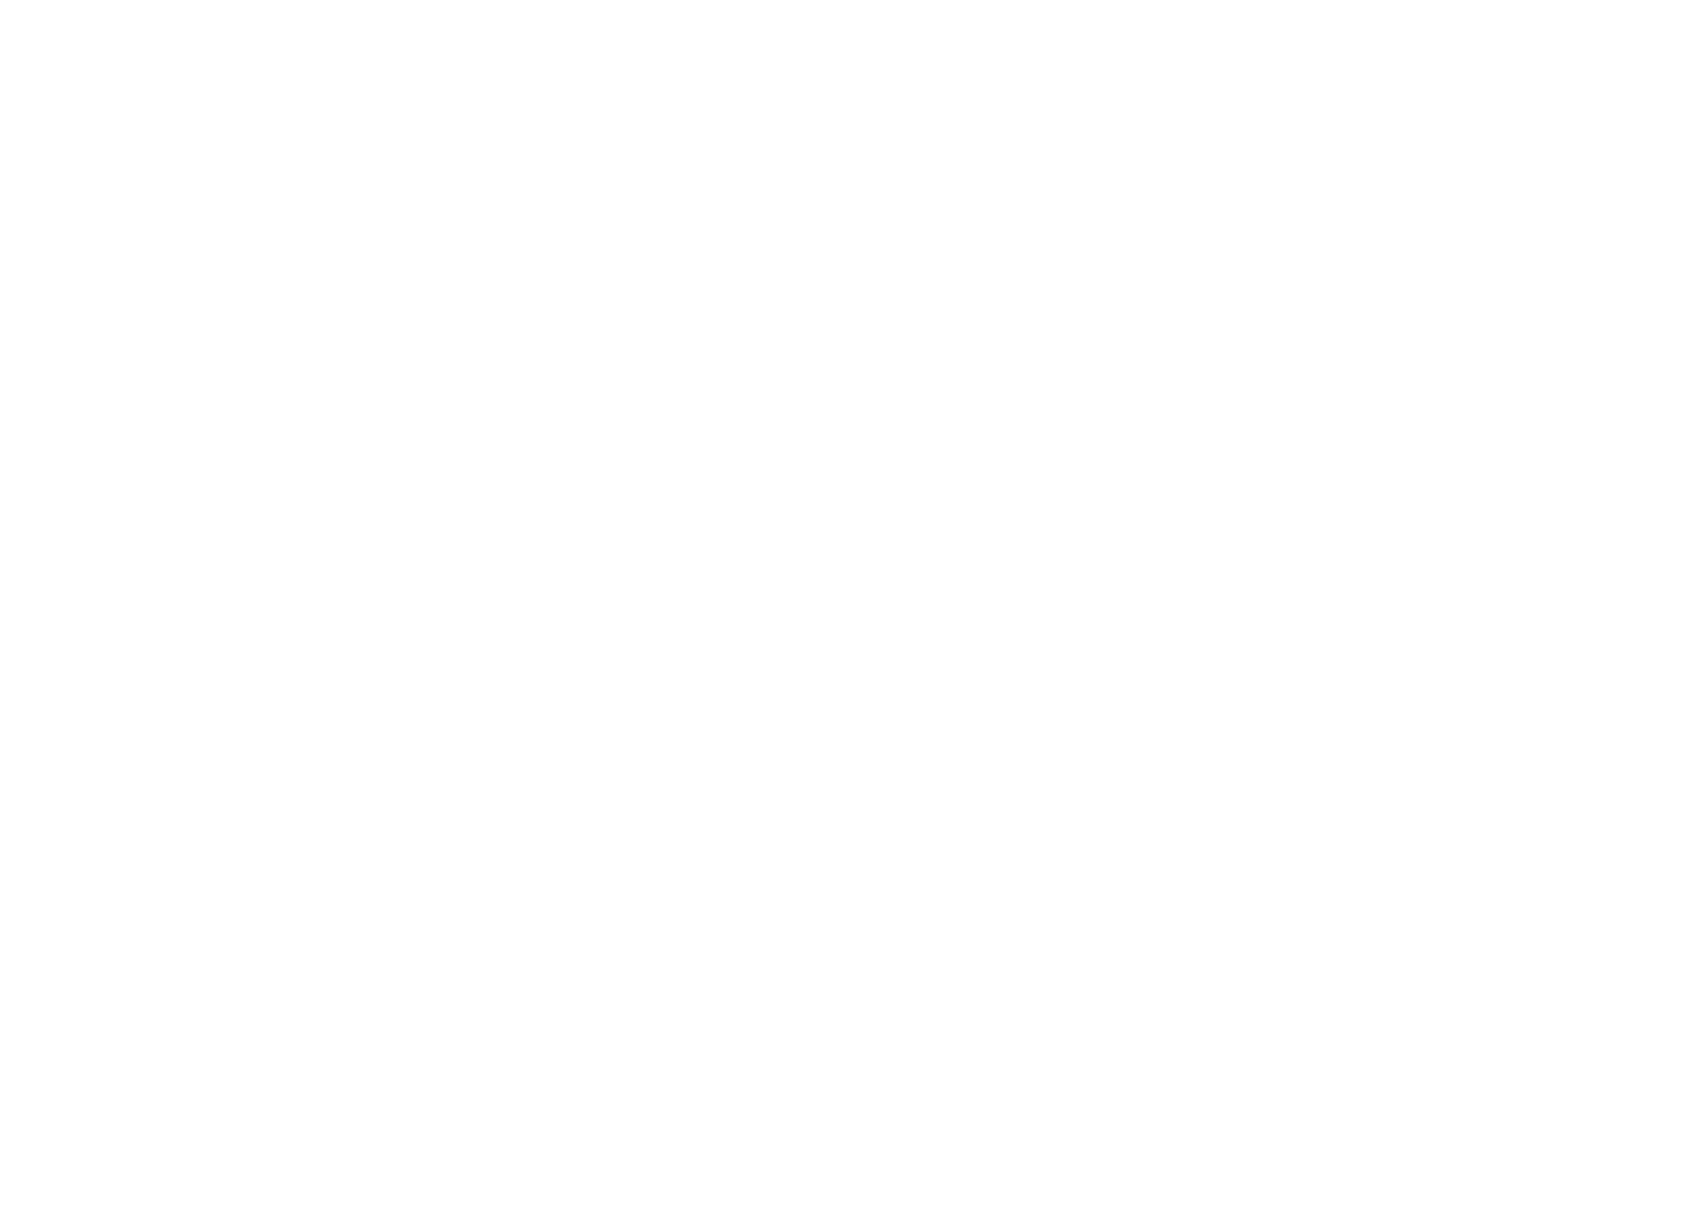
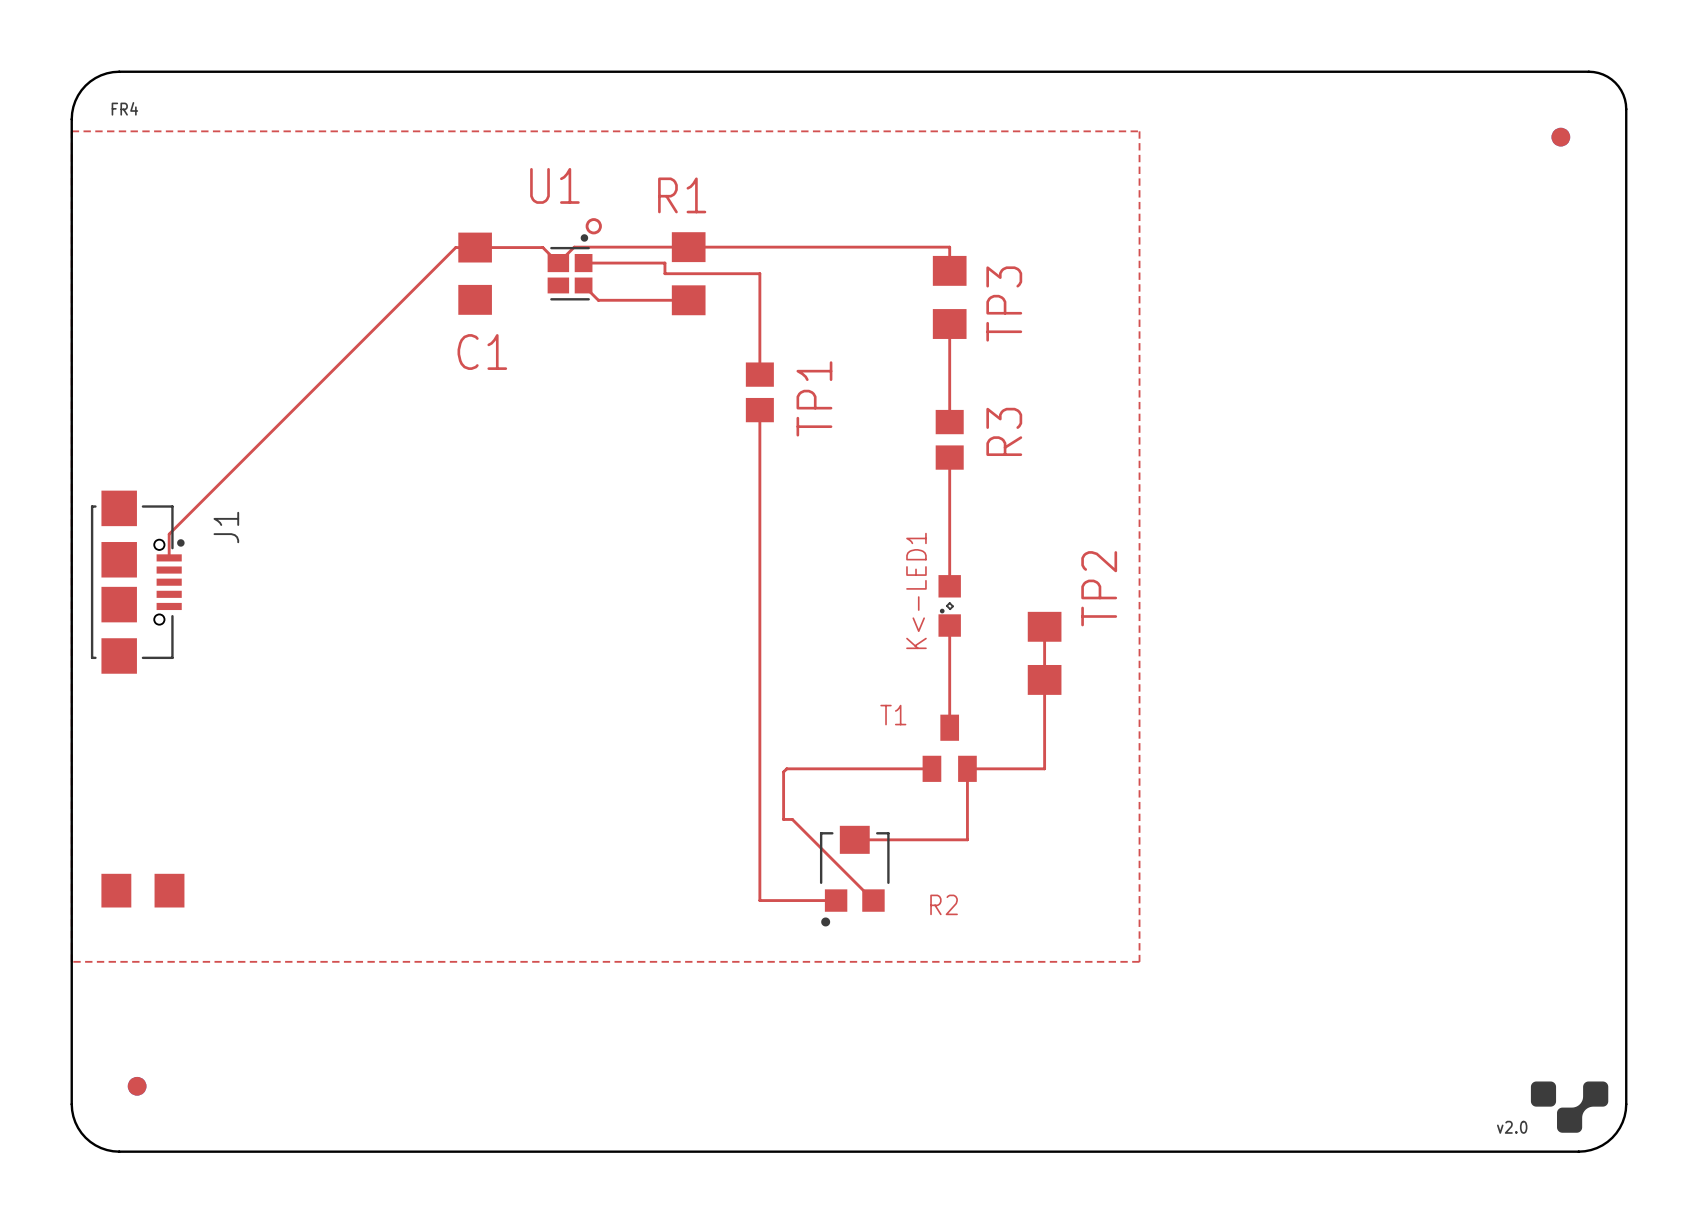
top zone outline: none -> (71, 131) (1139, 131) (1139, 961) (71, 961) (71, 131)
text: none -> U1 (554, 185)
text: none -> R1 (682, 195)
drawing: none -> [585, 218, 602, 235]
top track: none -> (583, 263) (664, 263) (664, 273) (759, 273) (759, 374)
part: none -> (570, 267)
top track: none -> (949, 270) (949, 247) (574, 247) (558, 263) (542, 247) (455, 247) (169, 534) (169, 557)
part: none -> (475, 273)
part: none -> (688, 273)
top track: none -> (583, 285) (598, 300) (688, 300)
part: none -> (949, 297)
text: none -> TP3 (1004, 304)
top track: none -> (949, 324) (949, 422)
text: none -> C1 (482, 352)
part: none -> (759, 392)
text: none -> TP1 (814, 398)
top track: none -> (759, 410) (759, 900) (836, 900)
text: none -> R3 (1004, 431)
part: none -> (949, 439)
top track: none -> (949, 457) (949, 586)
J1: none -> (137, 582)
text: none -> TP2 (1099, 588)
text: none -> K<-LED1 (916, 590)
part: none -> (949, 605)
part: none -> (848, 611)
top track: none -> (949, 625) (949, 727)
top track: none -> (1044, 626) (1044, 768) (967, 768) (967, 839) (854, 839)
part: none -> (1044, 653)
text: none -> T1 (893, 715)
part: none -> (949, 748)
top track: none -> (931, 768) (786, 768) (783, 772) (783, 819) (792, 819) (873, 900)
part: none -> (854, 876)
part: none -> (142, 890)
text: none -> R2 (944, 904)

